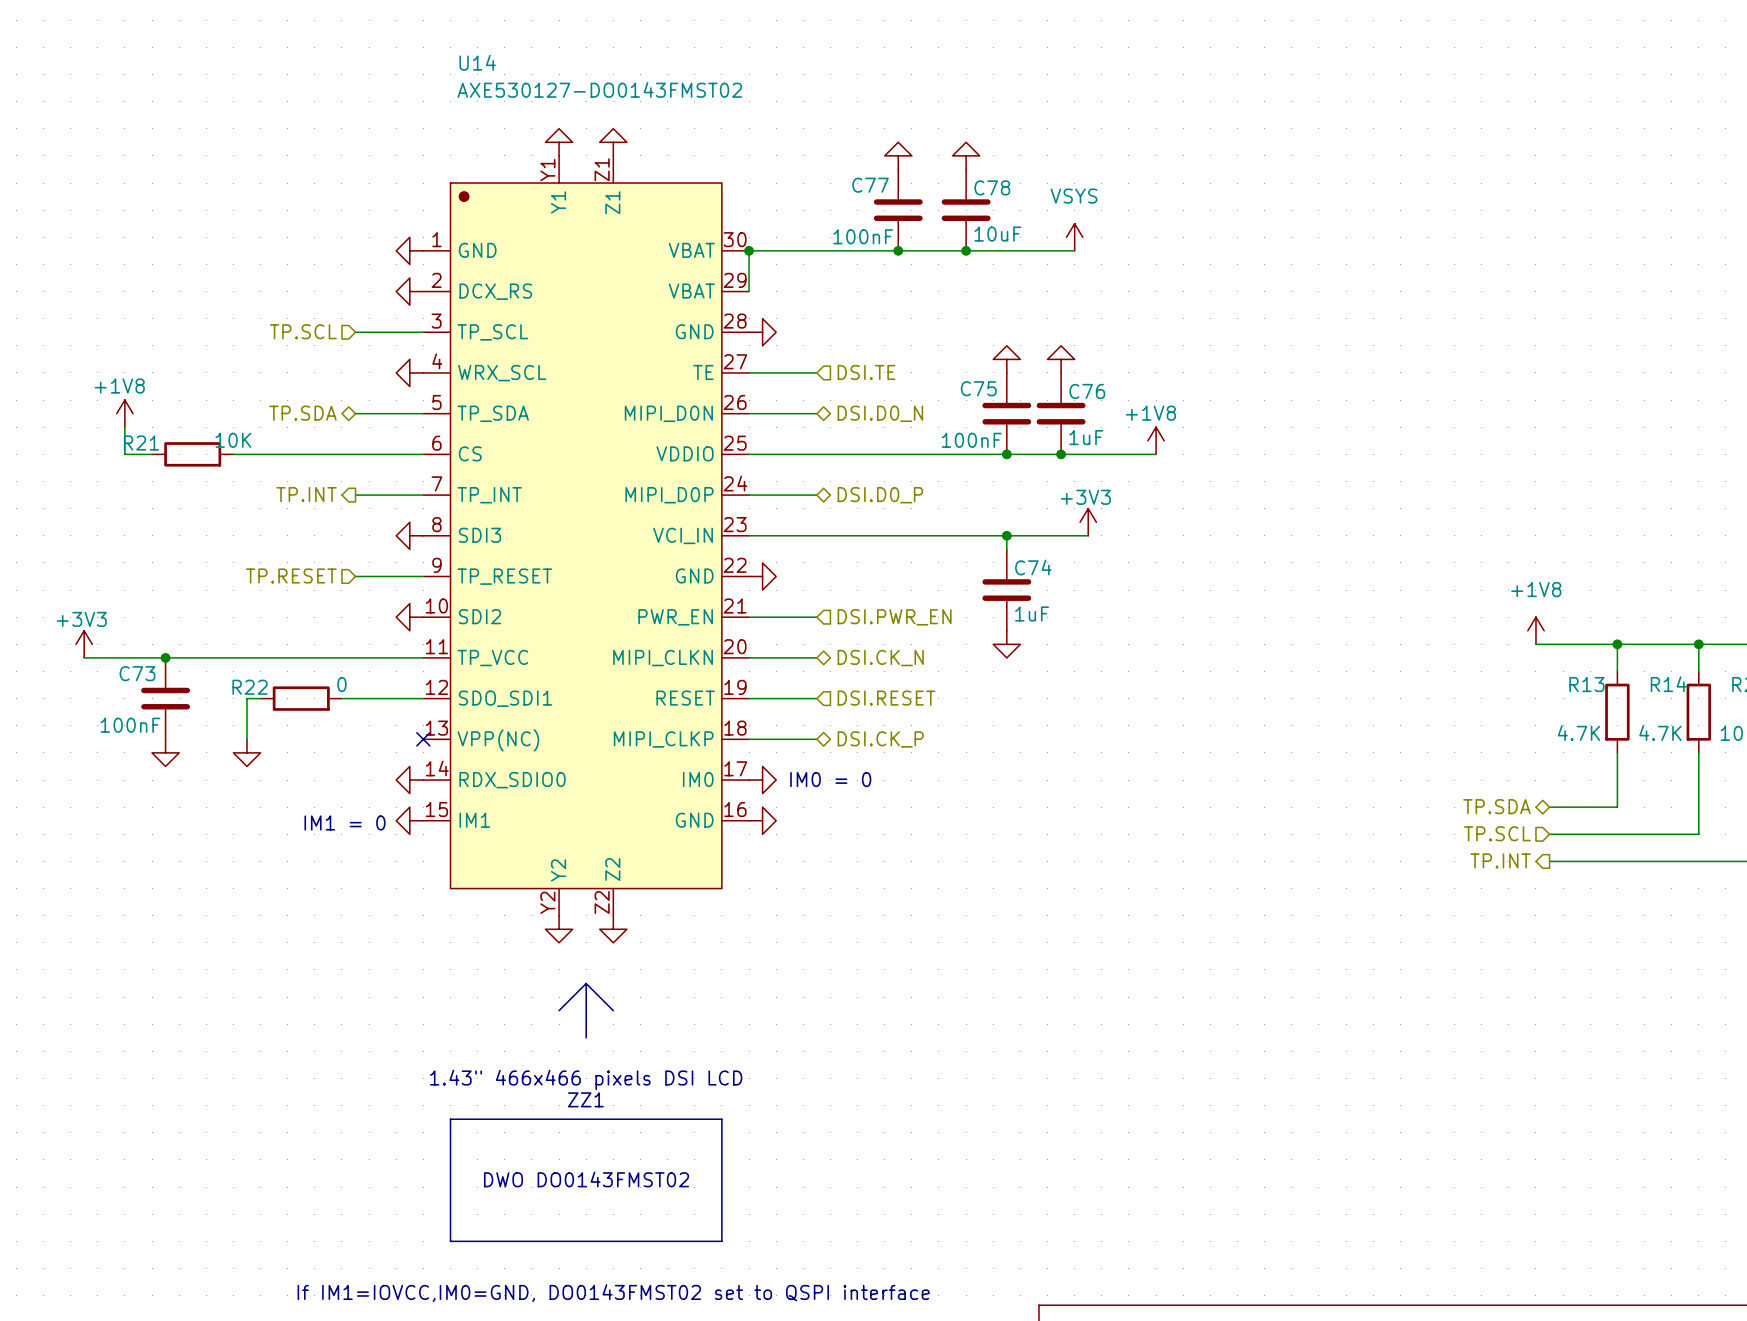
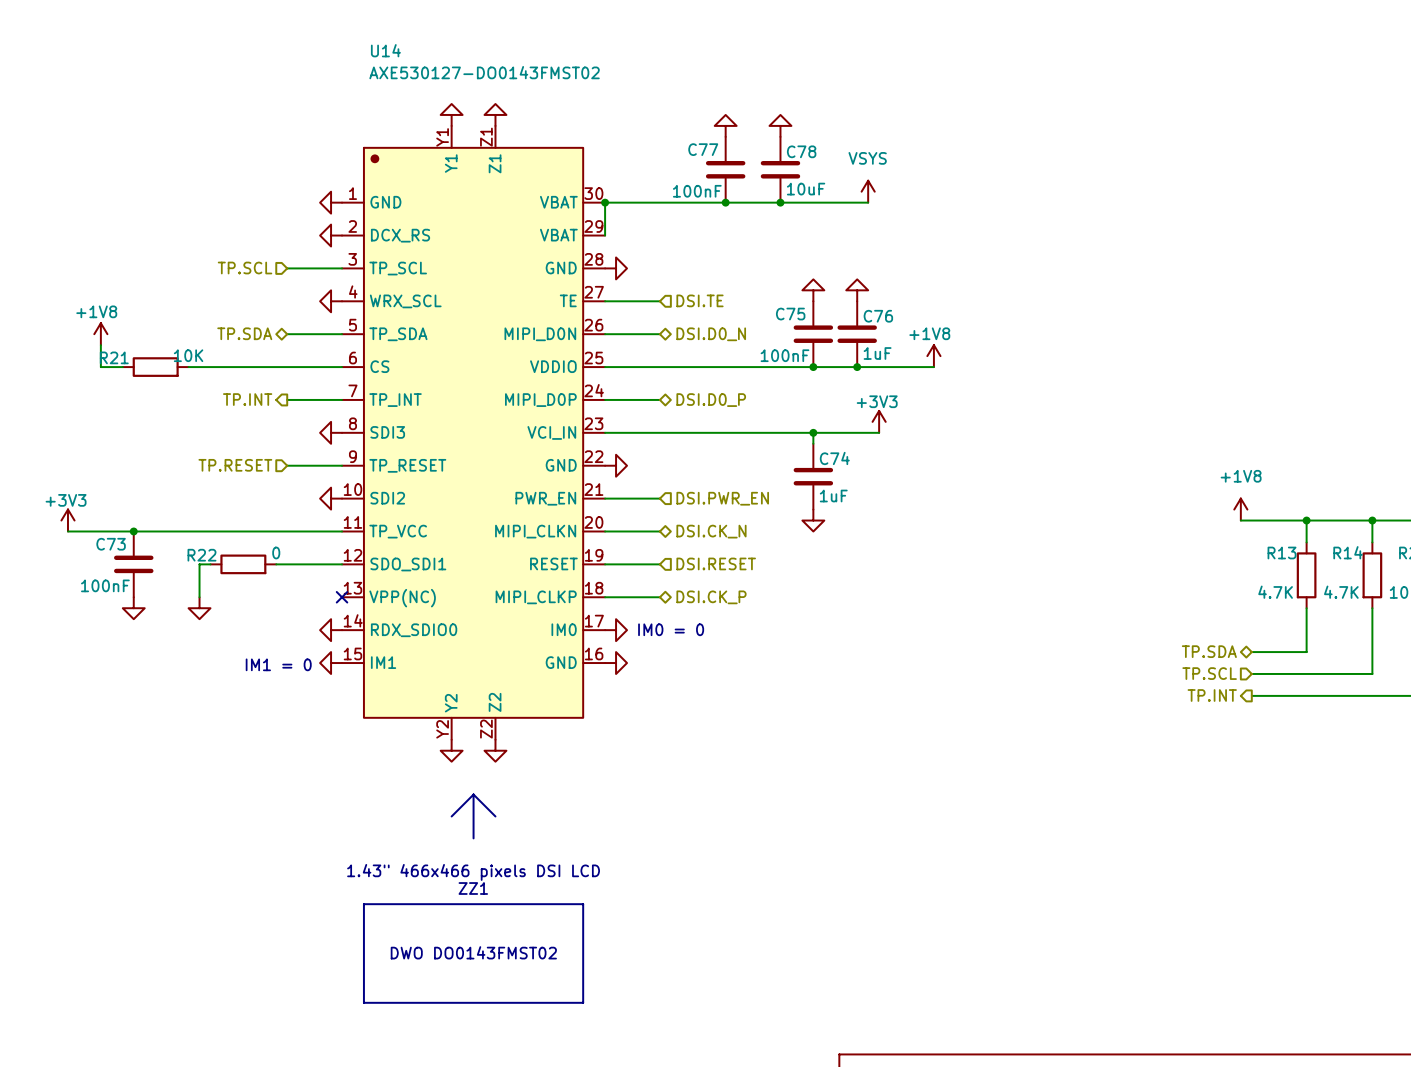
text: If IM1=IOVCC,IM0=GND, DO0143FMST02 set to QSPI interface (613, 1293) -> none

